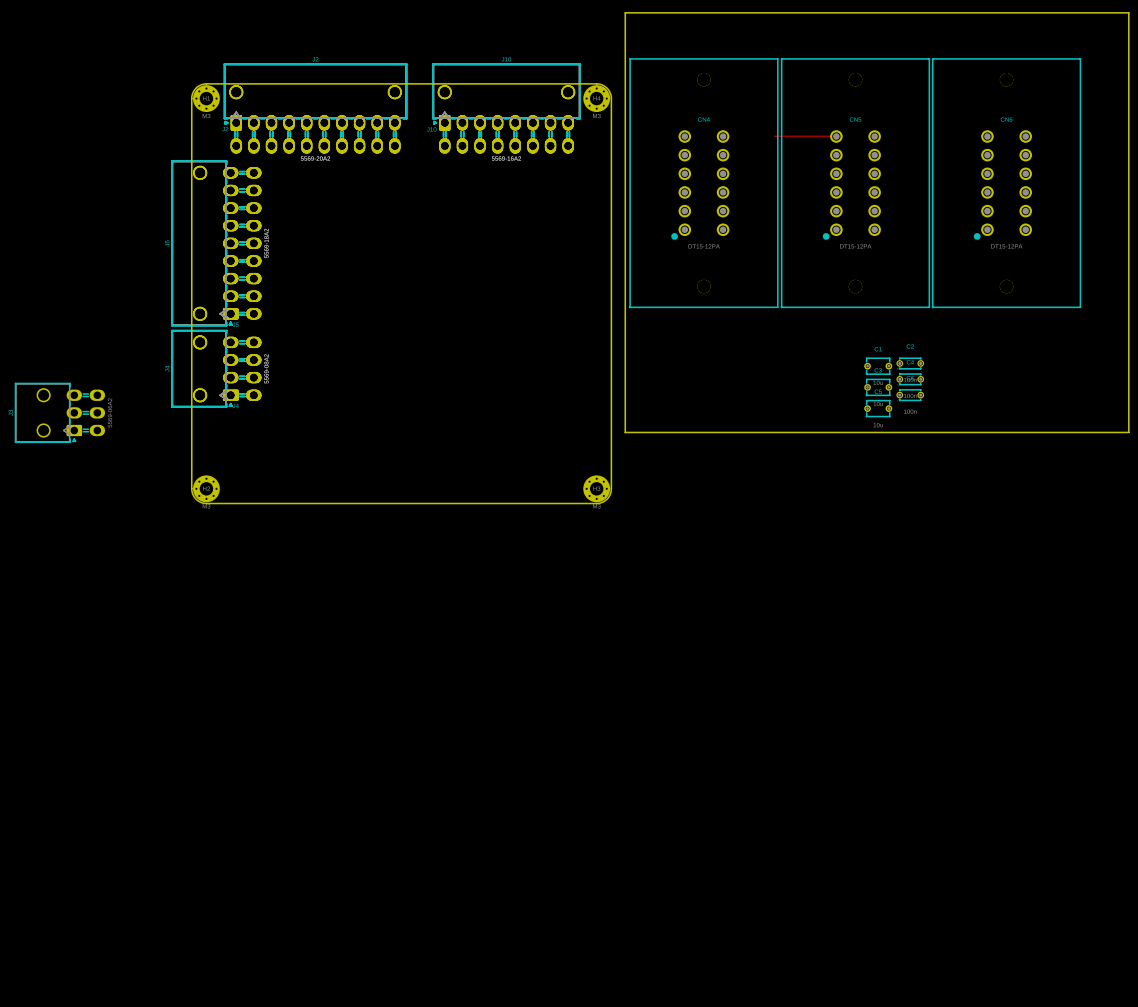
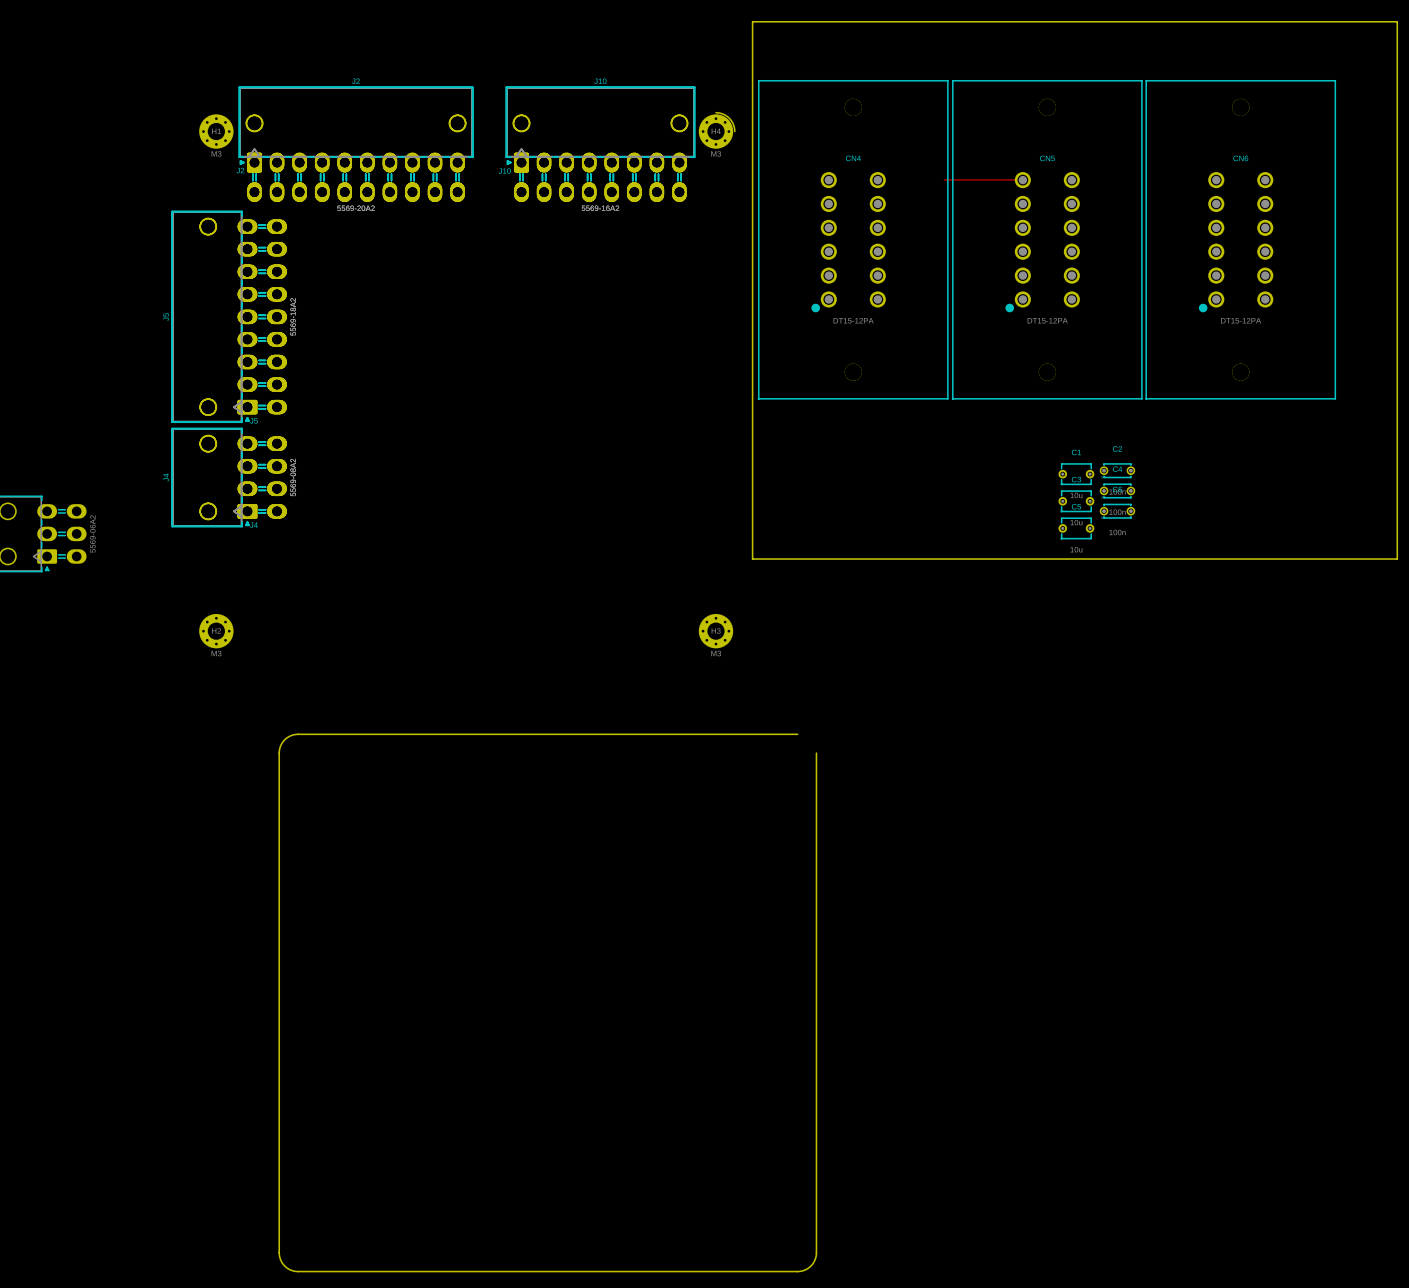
board edge: (596, 83) (206, 83) (196, 88) (191, 98) (191, 488) (196, 499) (206, 503) (596, 503) (607, 499) (611, 488) (611, 98) -> none
board edge: none -> (797, 734) (298, 734) (284, 739) (279, 753) (279, 1252) (284, 1266) (298, 1271) (797, 1271) (810, 1266) (816, 1252) (816, 753)

